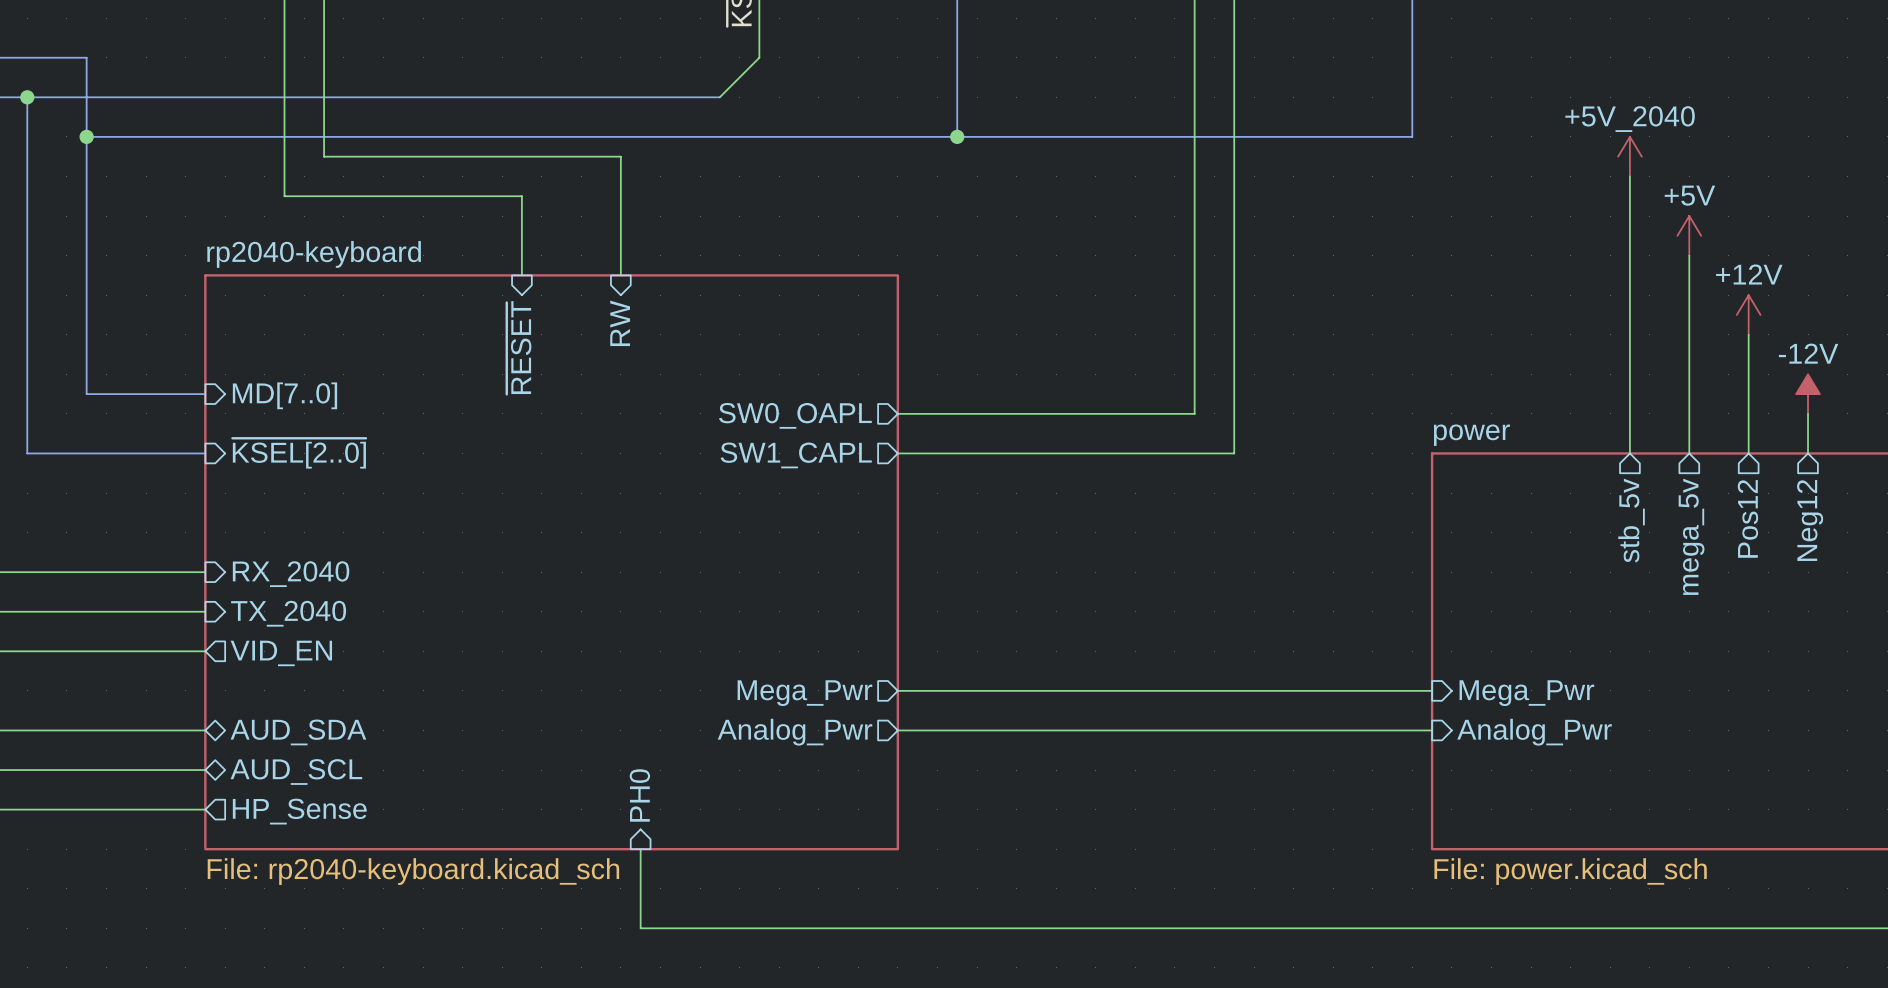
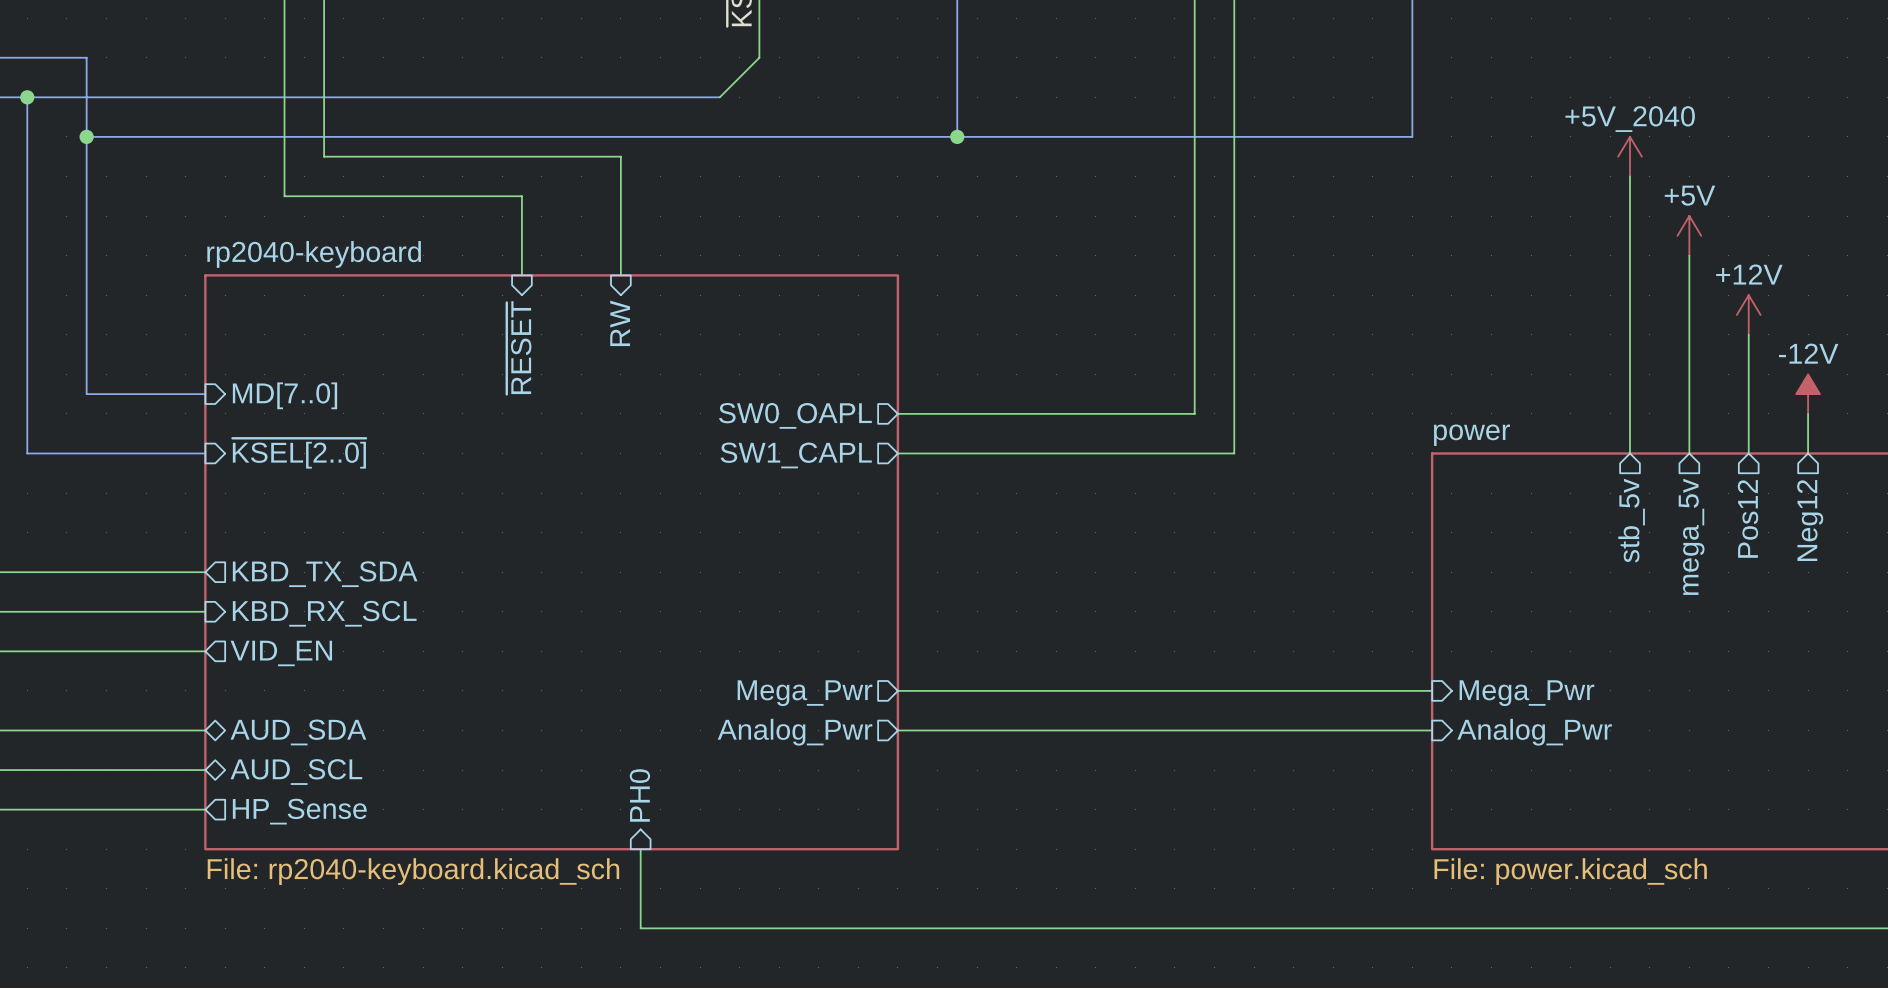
sheet pin shape: input (291, 574) -> output (325, 574)
sheet pin: RX_2040 (291, 574) -> KBD_TX_SDA (325, 574)
sheet pin: TX_2040 (288, 613) -> KBD_RX_SCL (324, 613)

